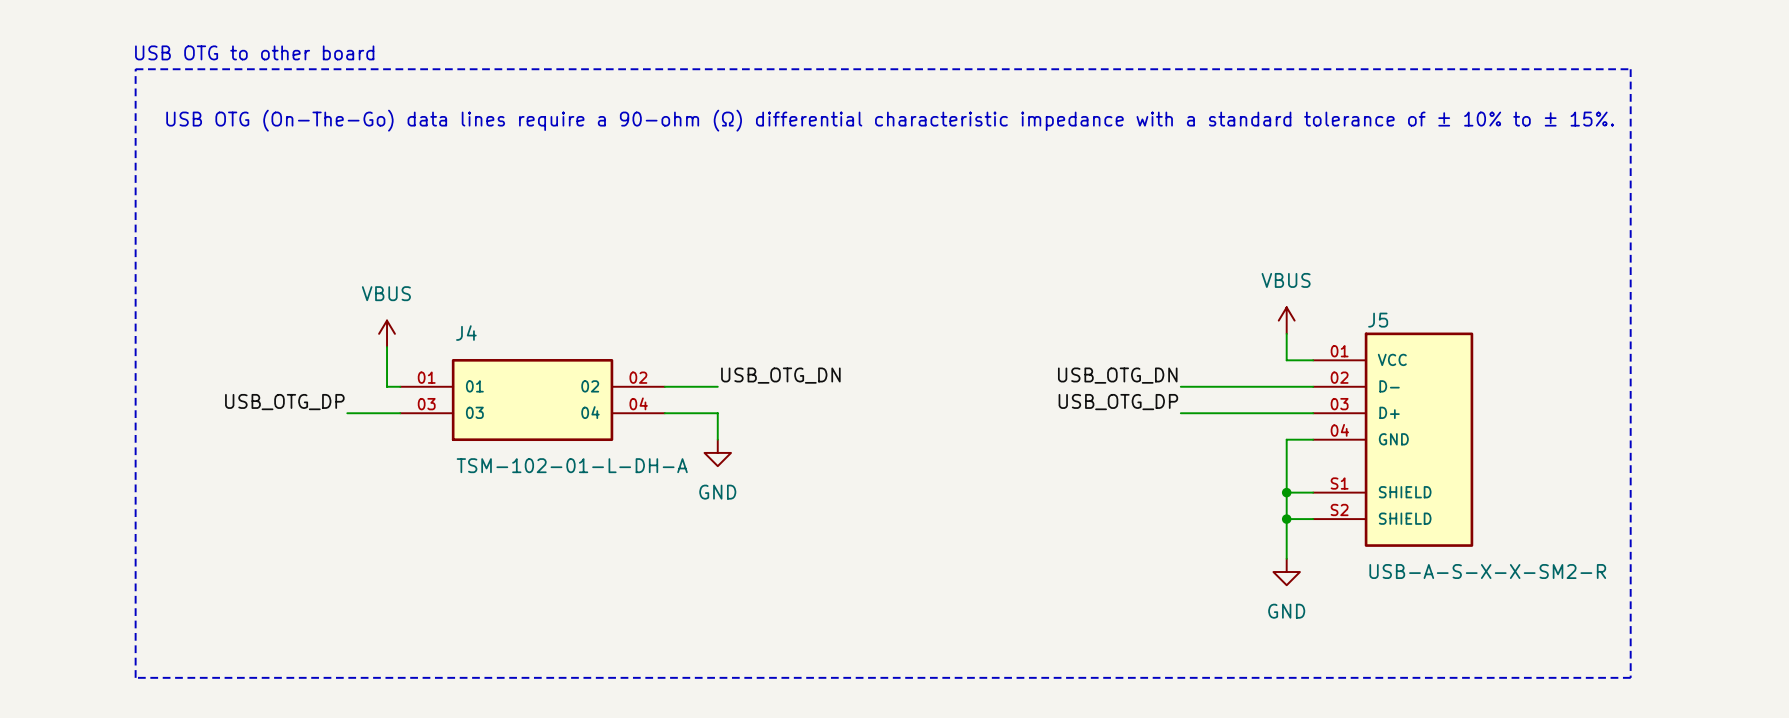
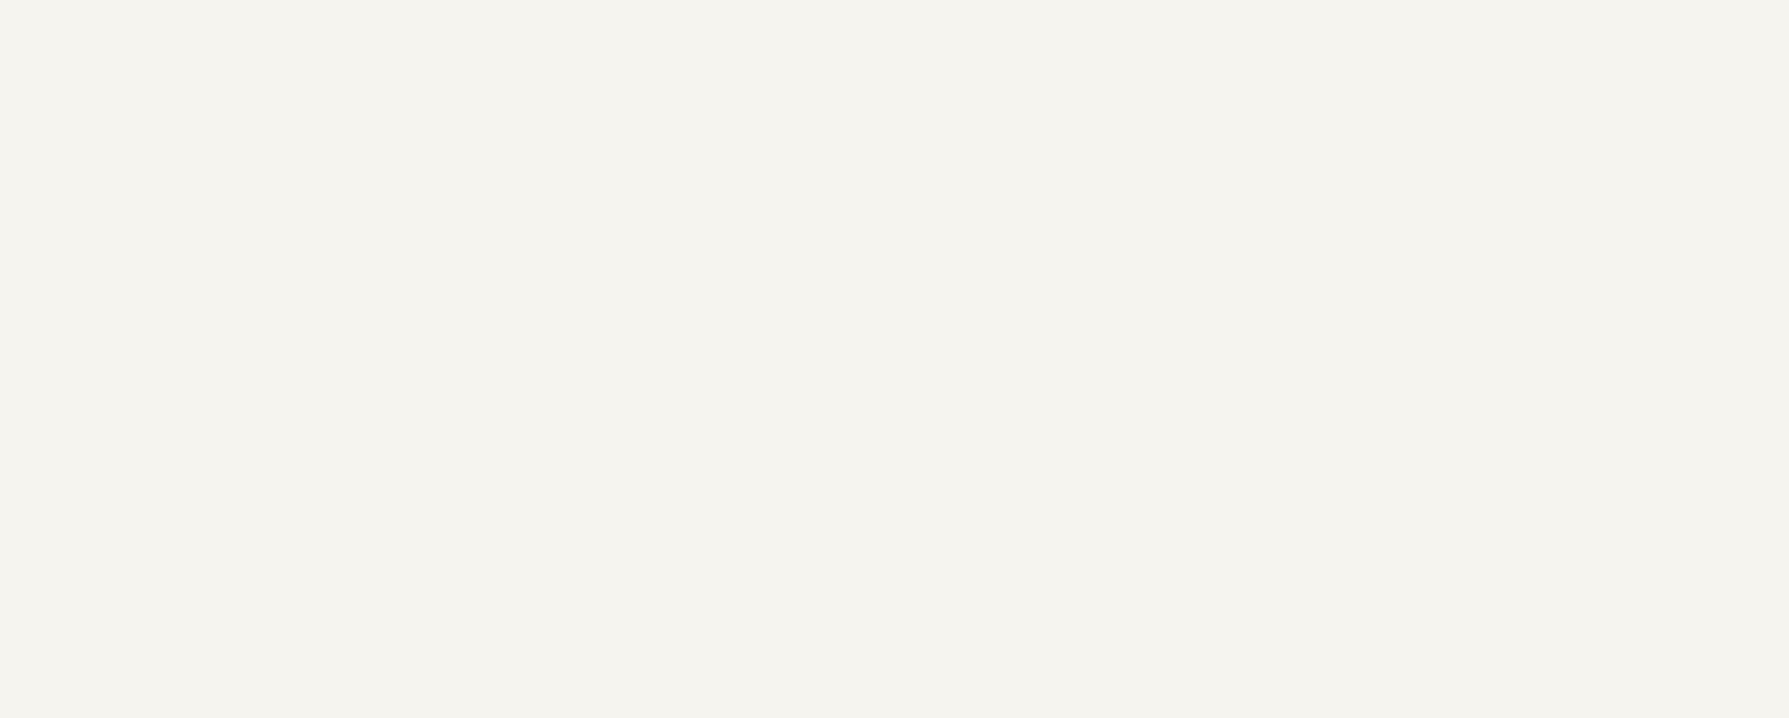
text: USB OTG to other board (254, 52) -> none
line: (135, 69) (1630, 69) (1630, 677) (135, 677) (135, 69) -> none
text: USB OTG (On-The-Go) data lines require a 90-ohm (Ω) differential characteristic impedance with a standard tolerance of ± 10% to ± 15%. (890, 120) -> none
power symbol: VBUS (1286, 320) -> none
power symbol: VBUS (387, 333) -> none
wire: (1286, 333) (1286, 360) (1313, 360) -> none
wire: (387, 347) (387, 386) (400, 386) -> none
label: USB_OTG_DN (780, 375) -> none
label: USB_OTG_DN (1117, 375) -> none
wire: (664, 386) (717, 386) -> none
wire: (1180, 386) (1313, 386) -> none
J4: TSM-102-01-L-DH-A (532, 400) -> none
label: USB_OTG_DP (284, 402) -> none
label: USB_OTG_DP (1118, 402) -> none
wire: (347, 413) (400, 413) -> none
wire: (664, 413) (717, 413) (717, 439) -> none
wire: (1180, 413) (1313, 413) -> none
wire: (1313, 439) (1286, 439) (1286, 558) -> none
J5: USB-A-S-X-X-SM2-R (1393, 439) -> none
power symbol: GND (717, 452) -> none
wire: (1286, 492) (1313, 492) -> none
junction: (1286, 492) -> none
wire: (1286, 519) (1313, 519) -> none
junction: (1286, 519) -> none
power symbol: GND (1286, 572) -> none

